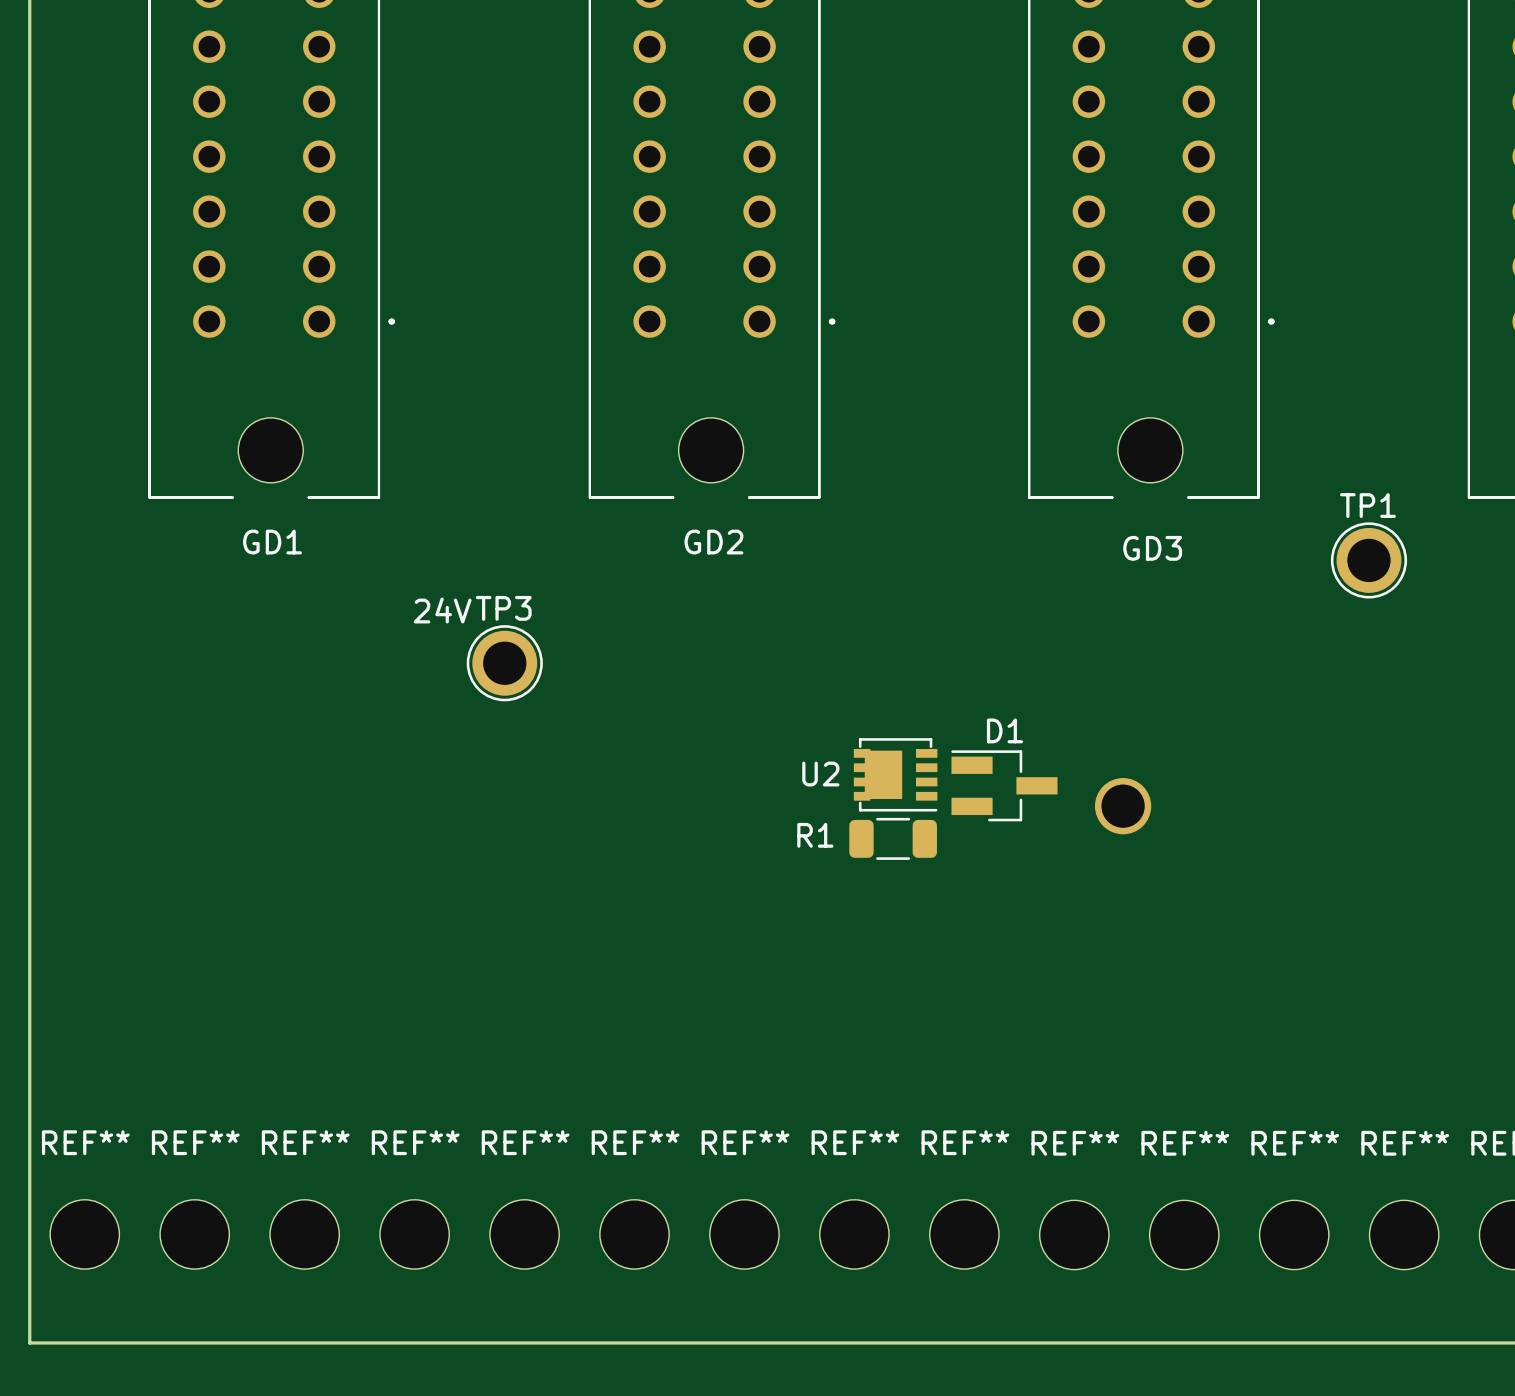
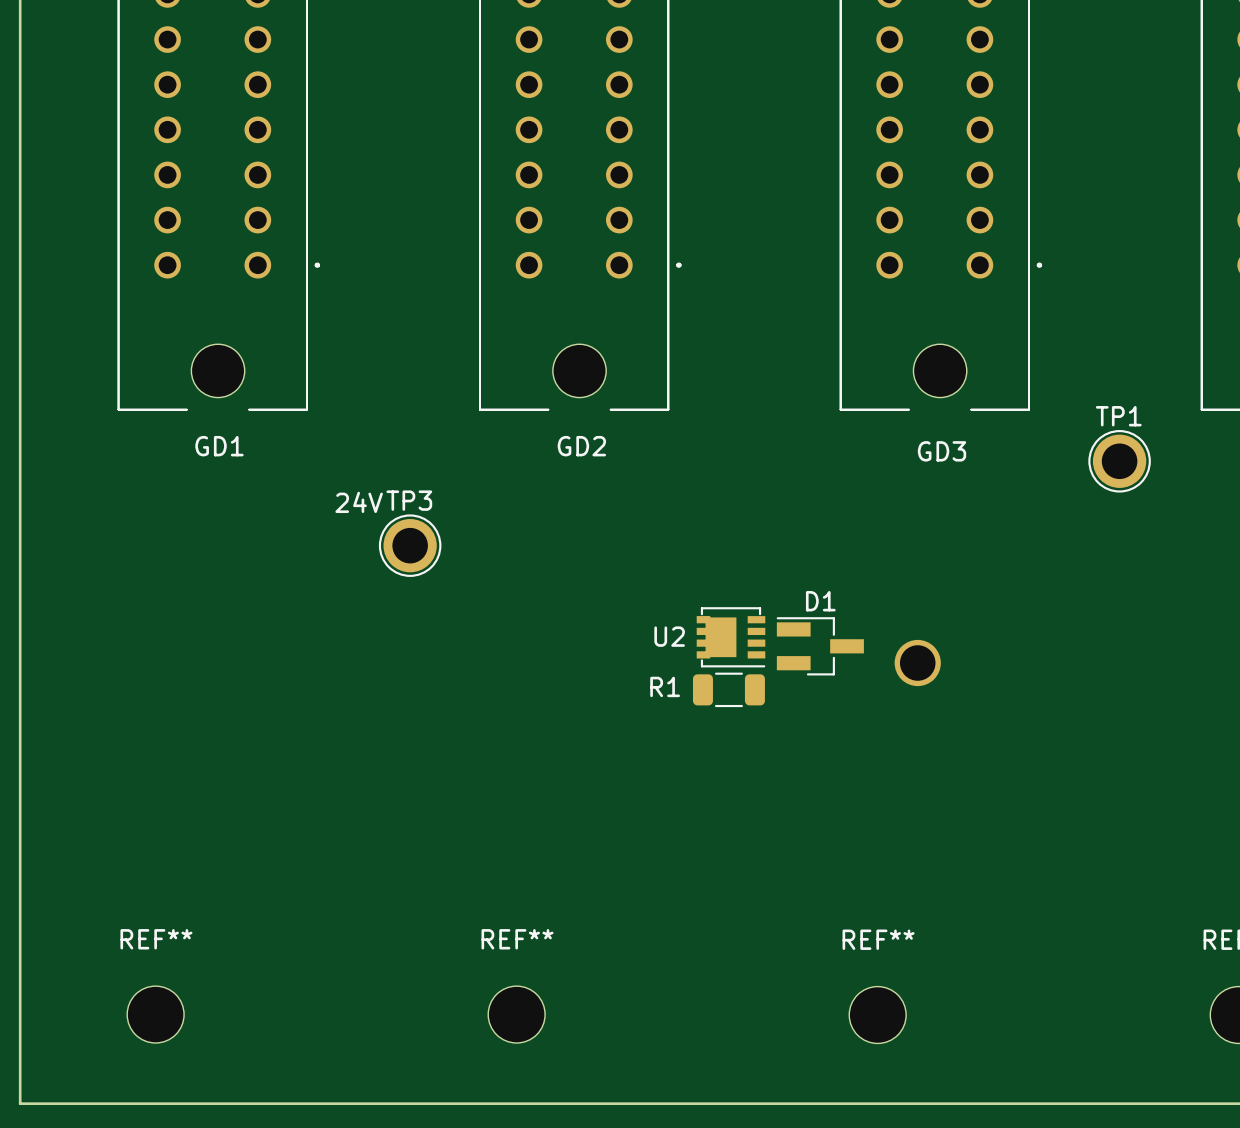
REF**: (84, 1234) -> none
REF**: (304, 1234) -> none
REF**: (414, 1234) -> none
REF**: (524, 1234) -> none
REF**: (744, 1234) -> none
REF**: (854, 1234) -> none
REF**: (964, 1234) -> none
REF**: (1184, 1234) -> none
REF**: (1294, 1234) -> none
REF**: (1404, 1234) -> none

